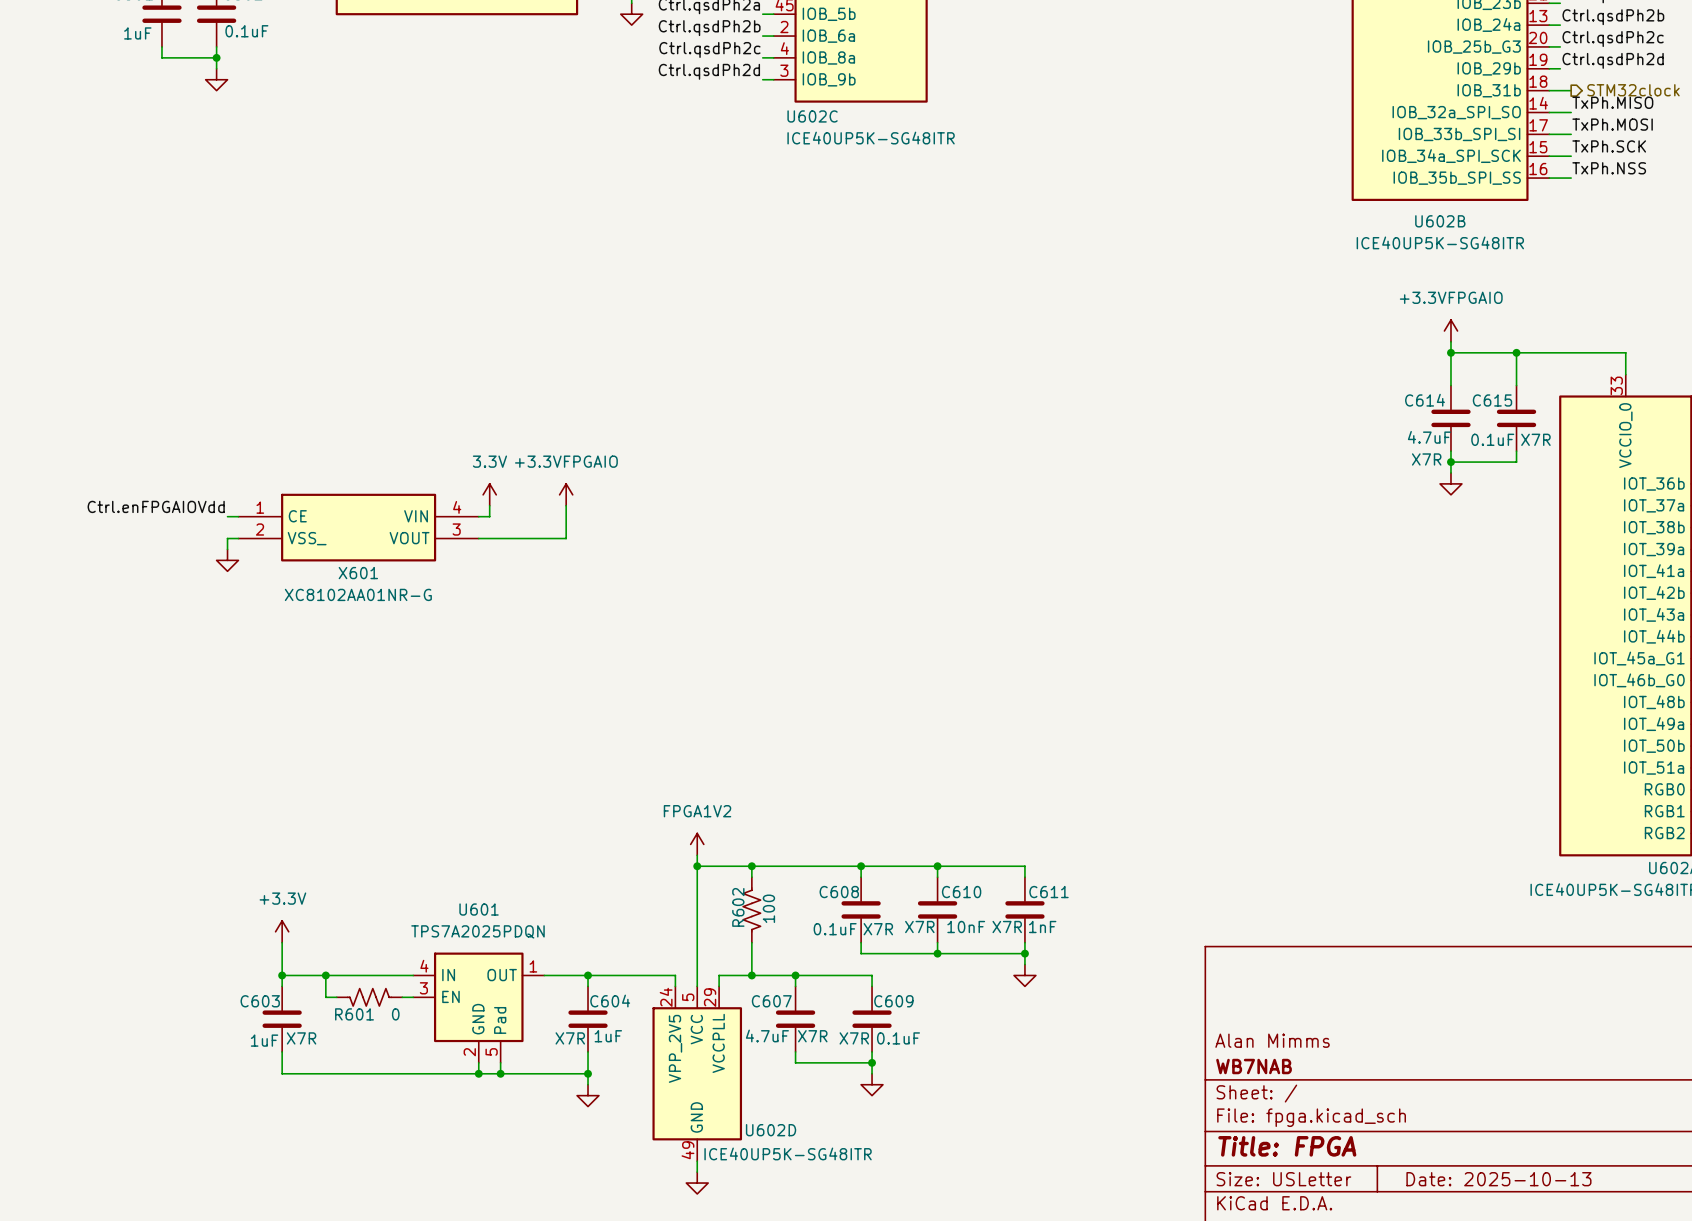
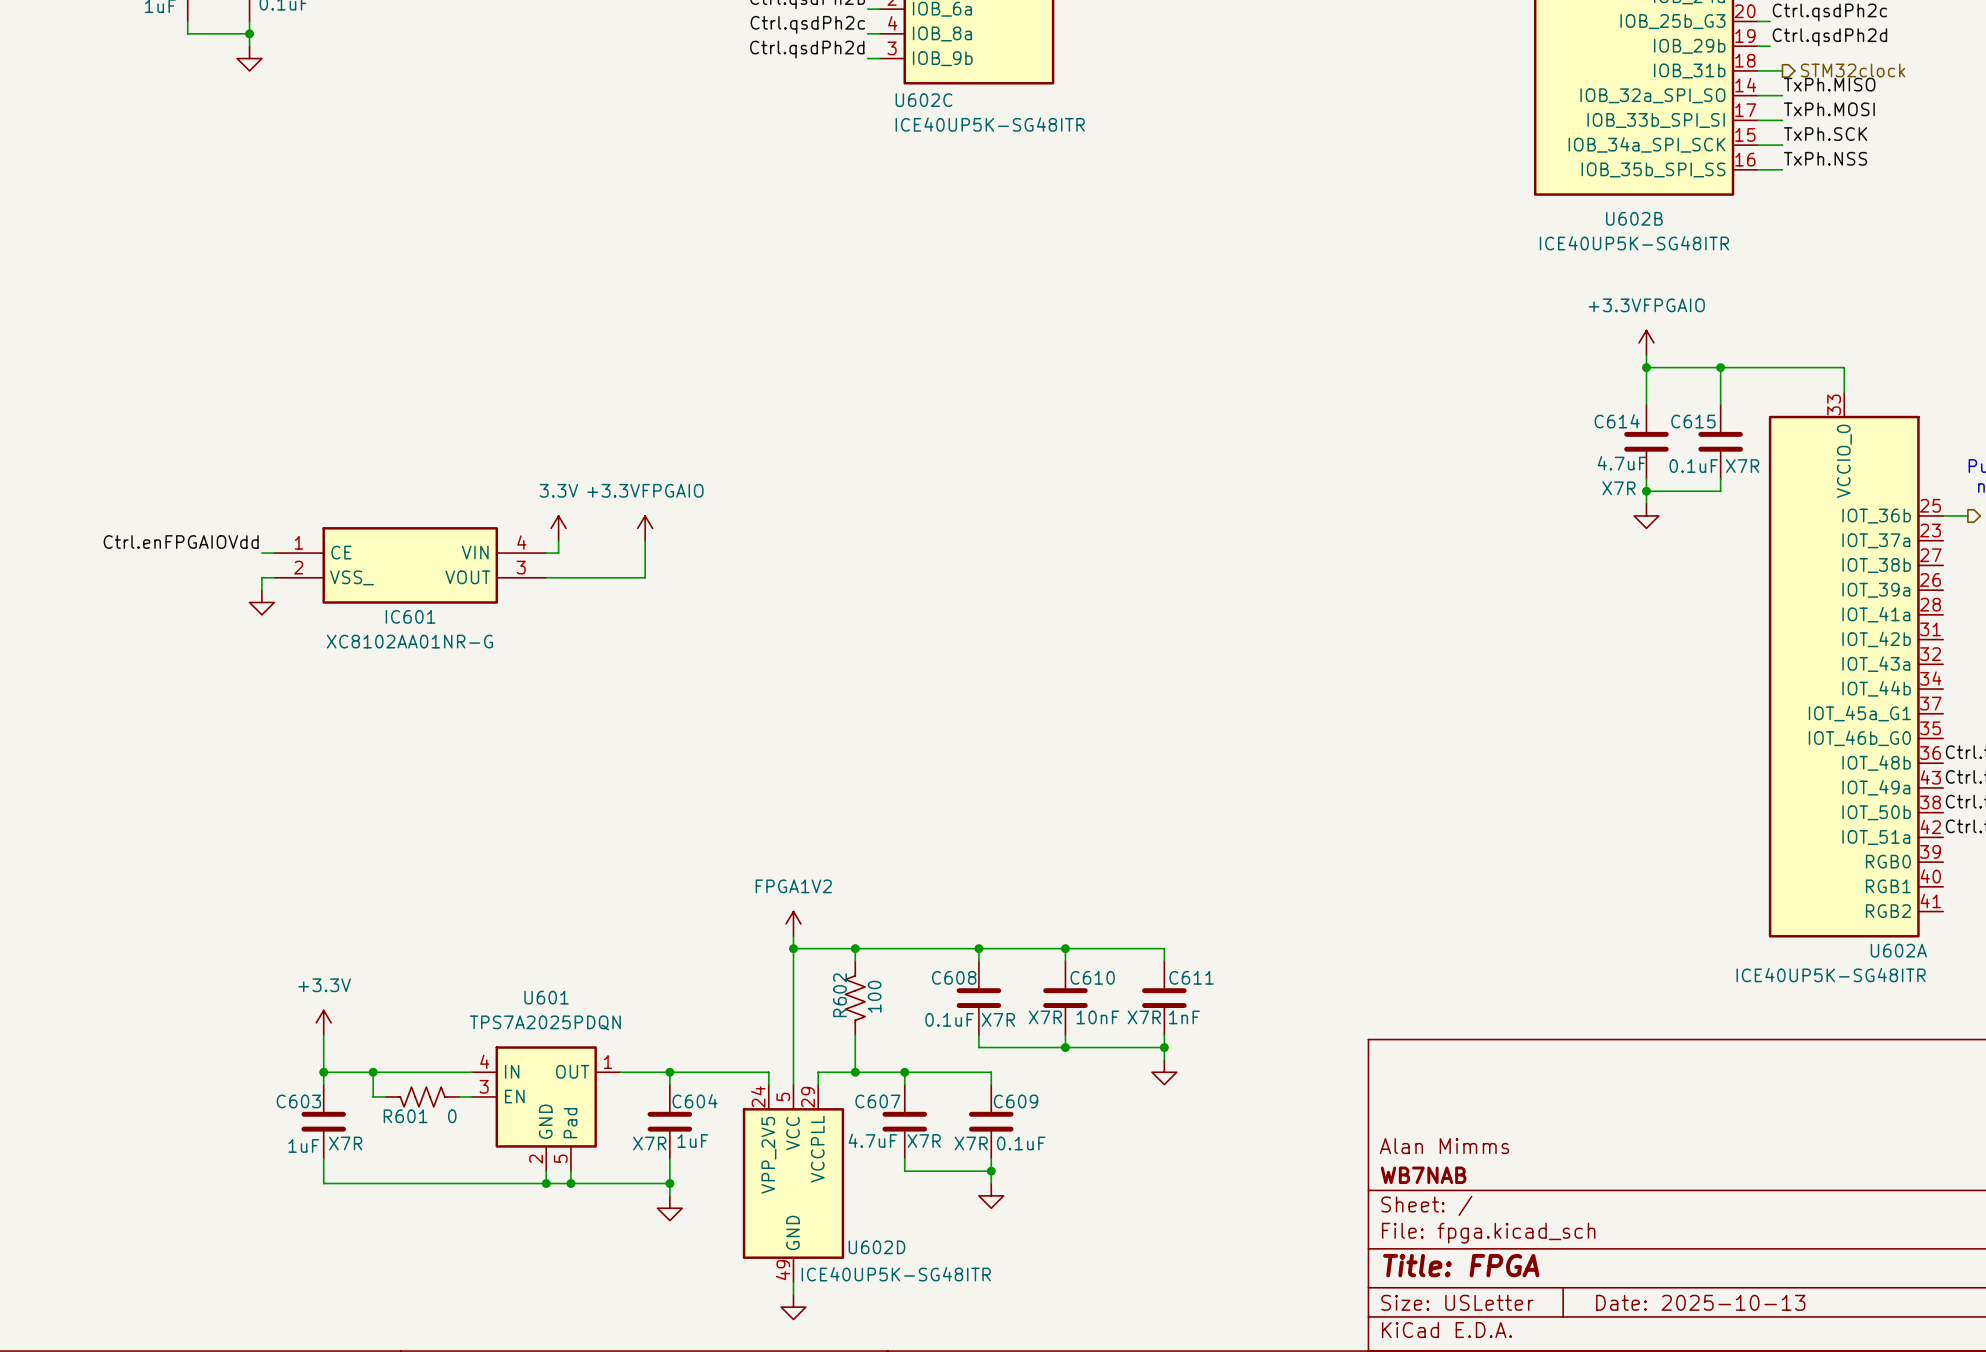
X601 name: X601 (358, 573) -> IC601 (410, 616)

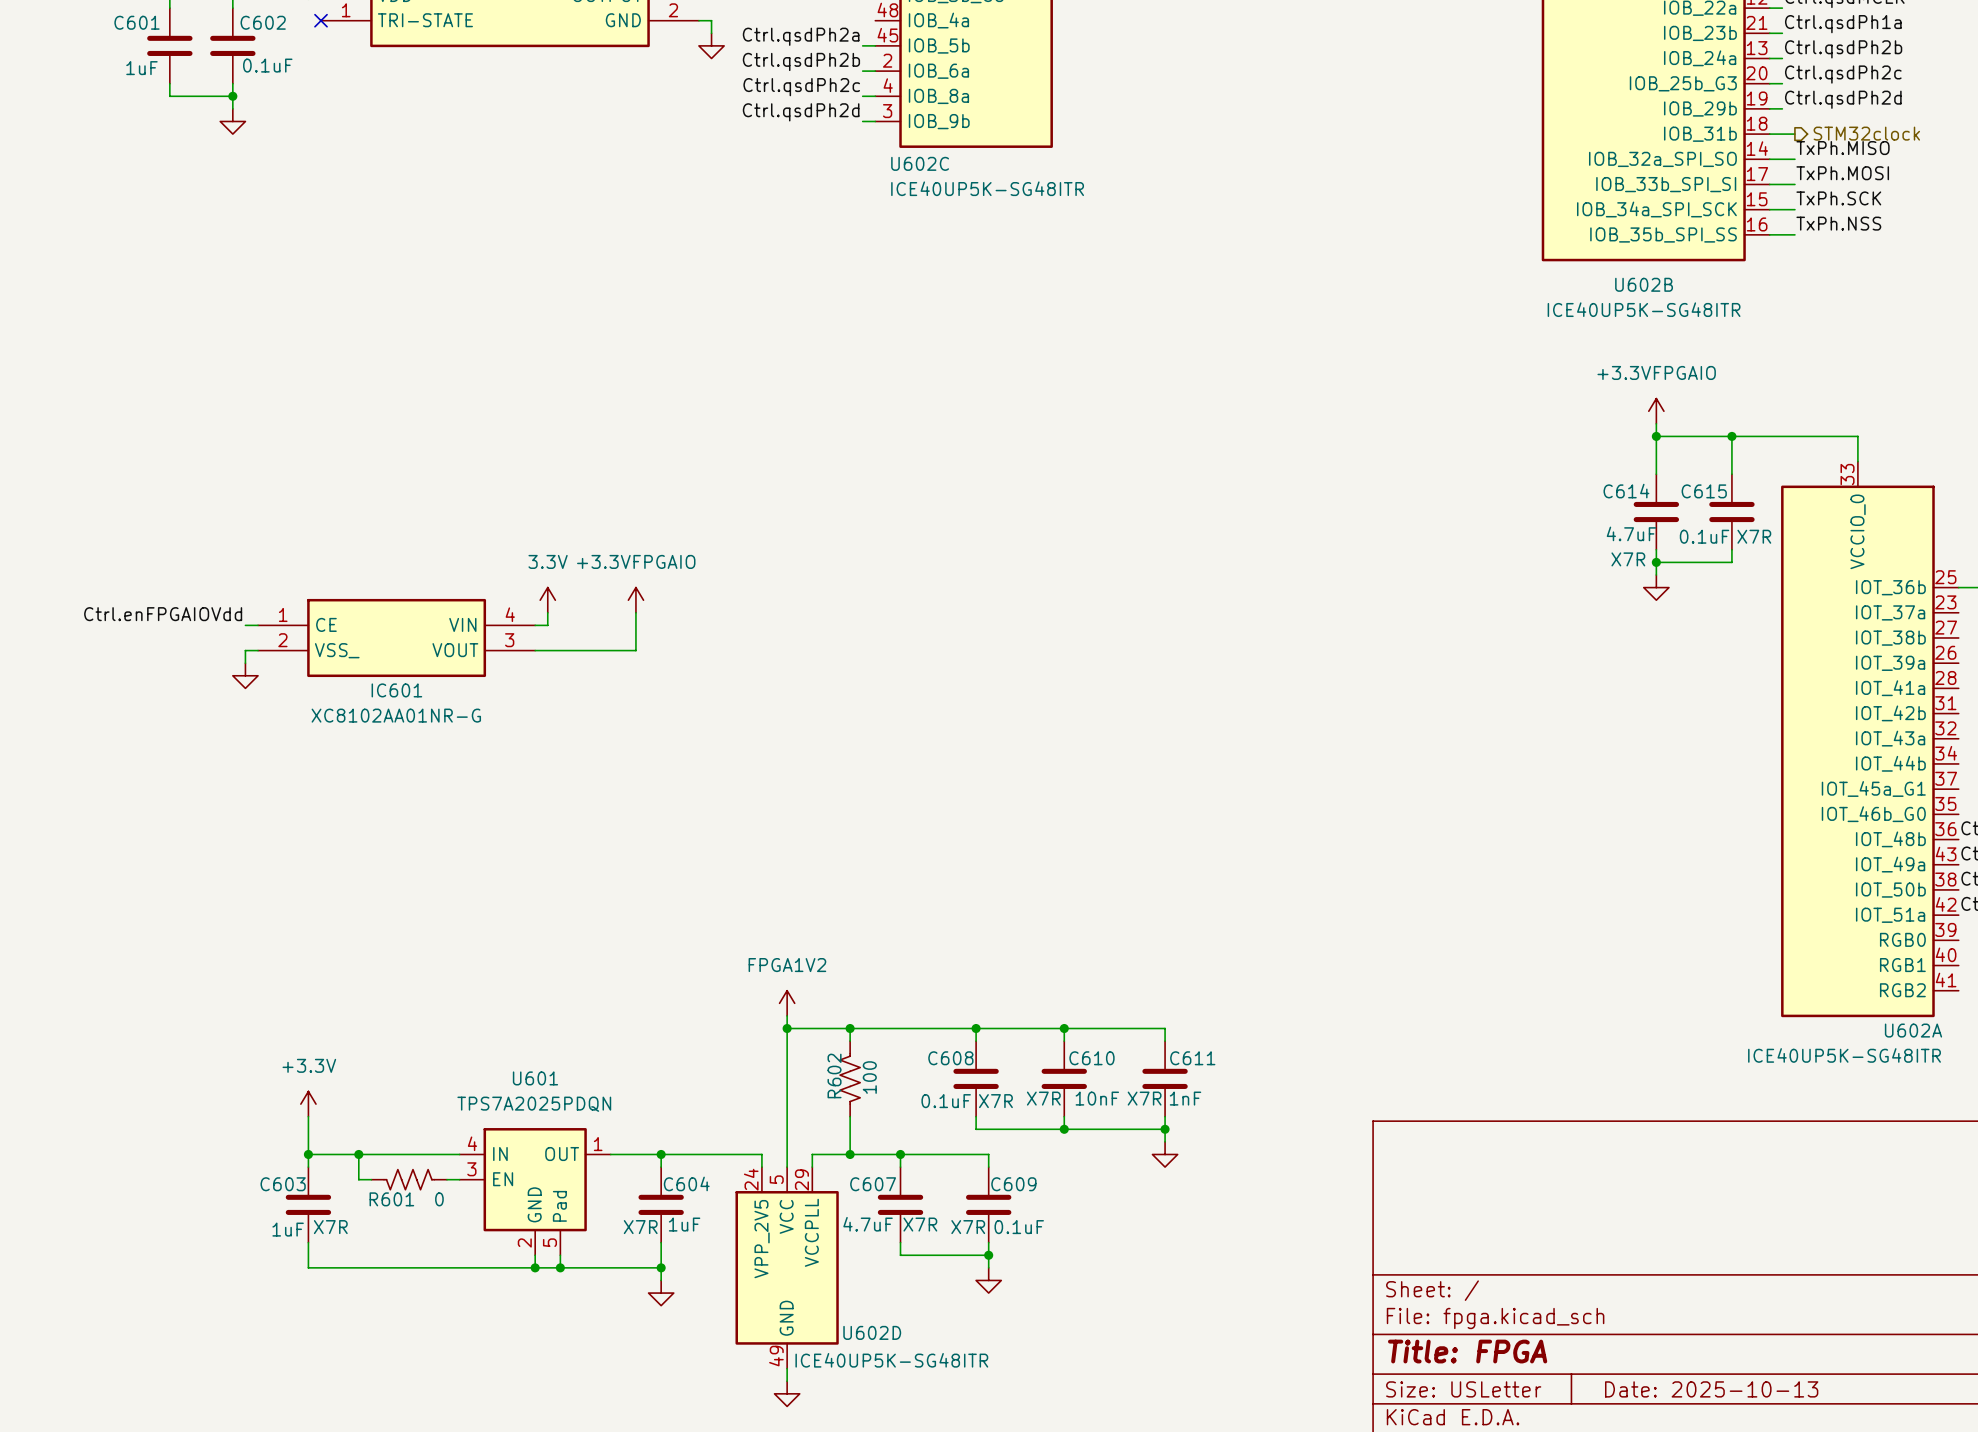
title block: Alan Mimms (1444, 1146) -> none
title block: WB7NAB (1423, 1175) -> none

